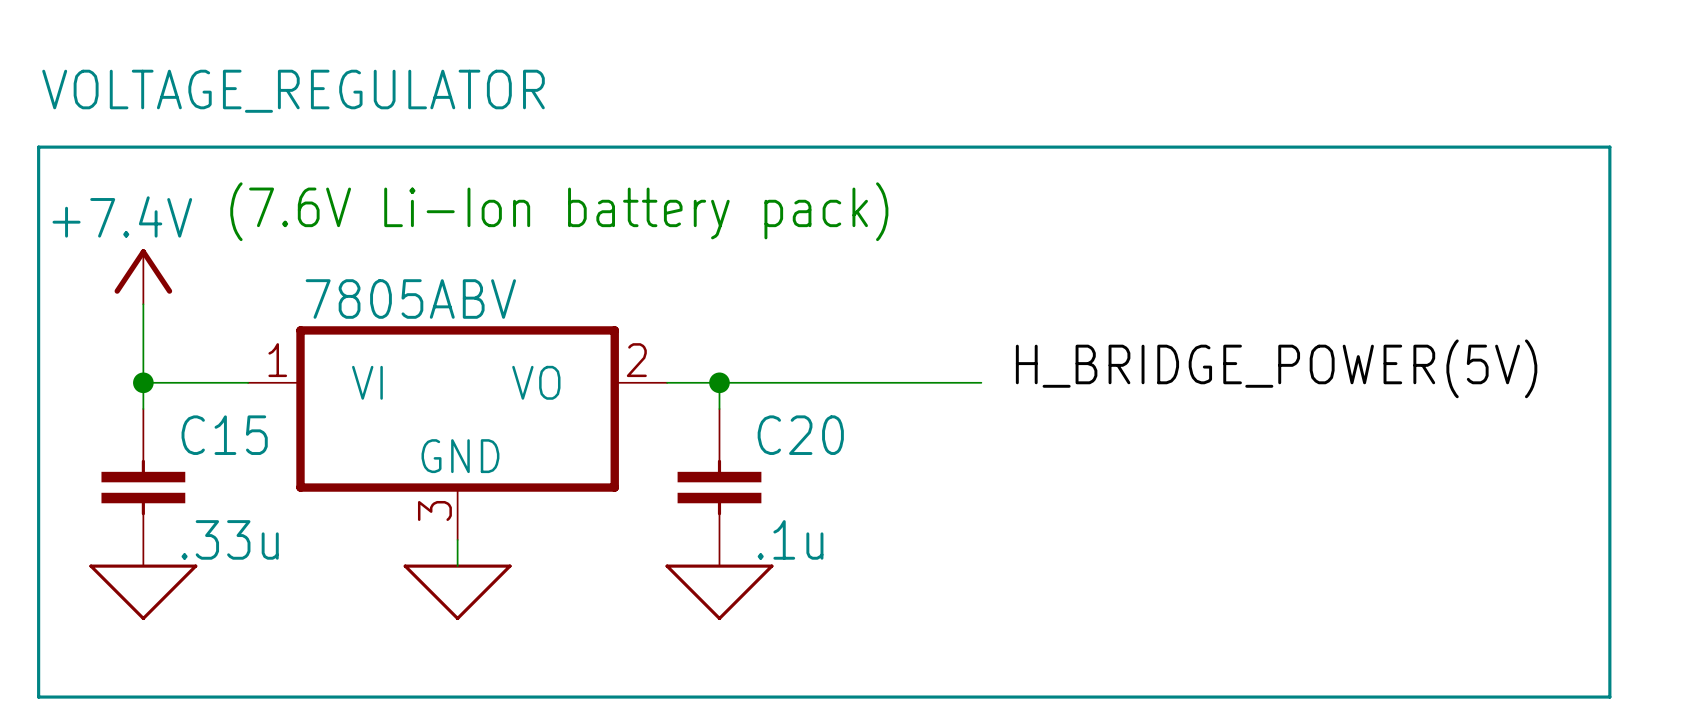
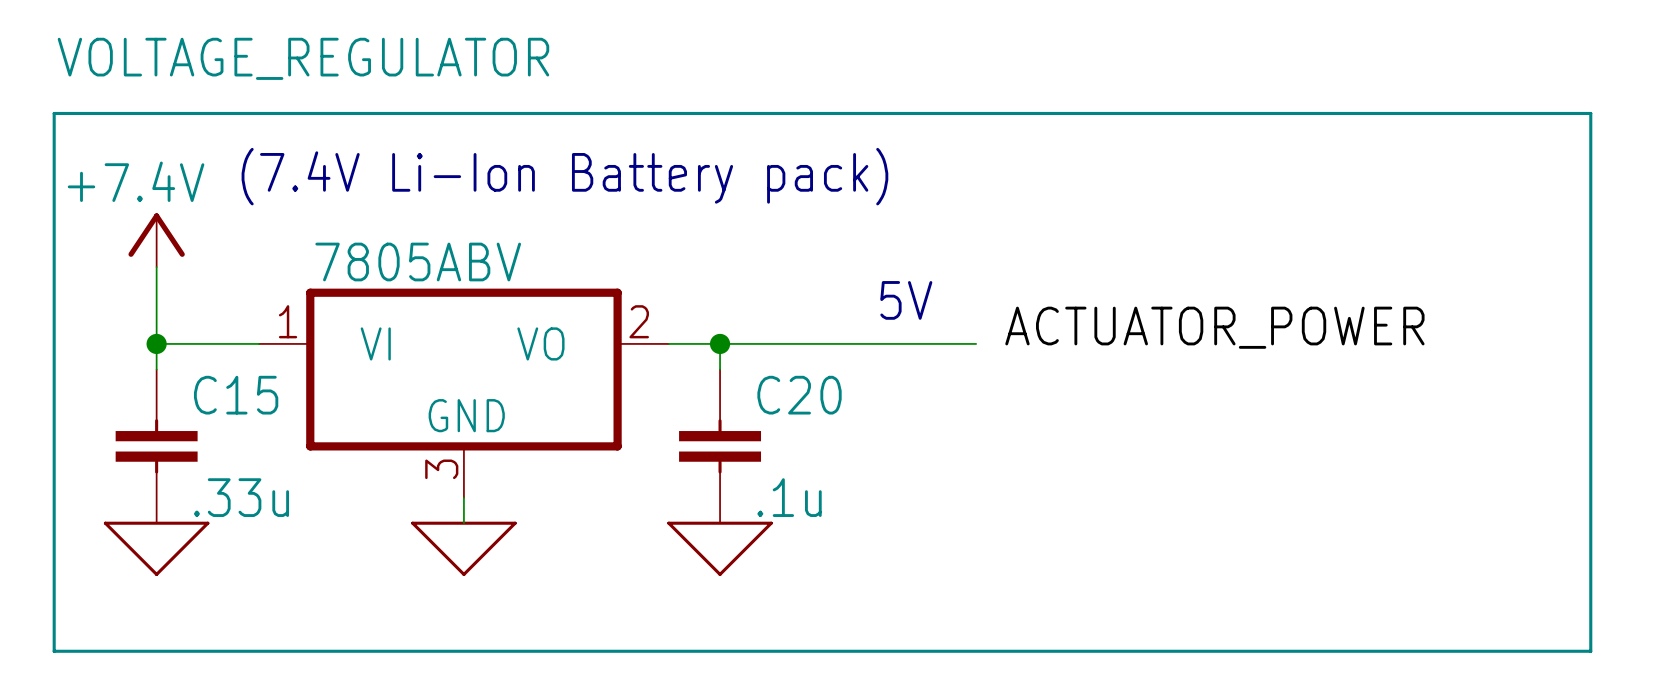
text: (7.6V Li-Ion battery pack) (559, 211) -> (7.4V Li-Ion Battery pack) (564, 176)
text: none -> 5V (906, 300)
label: H_BRIDGE_POWER(5V) (1276, 368) -> ACTUATOR_POWER (1214, 327)

